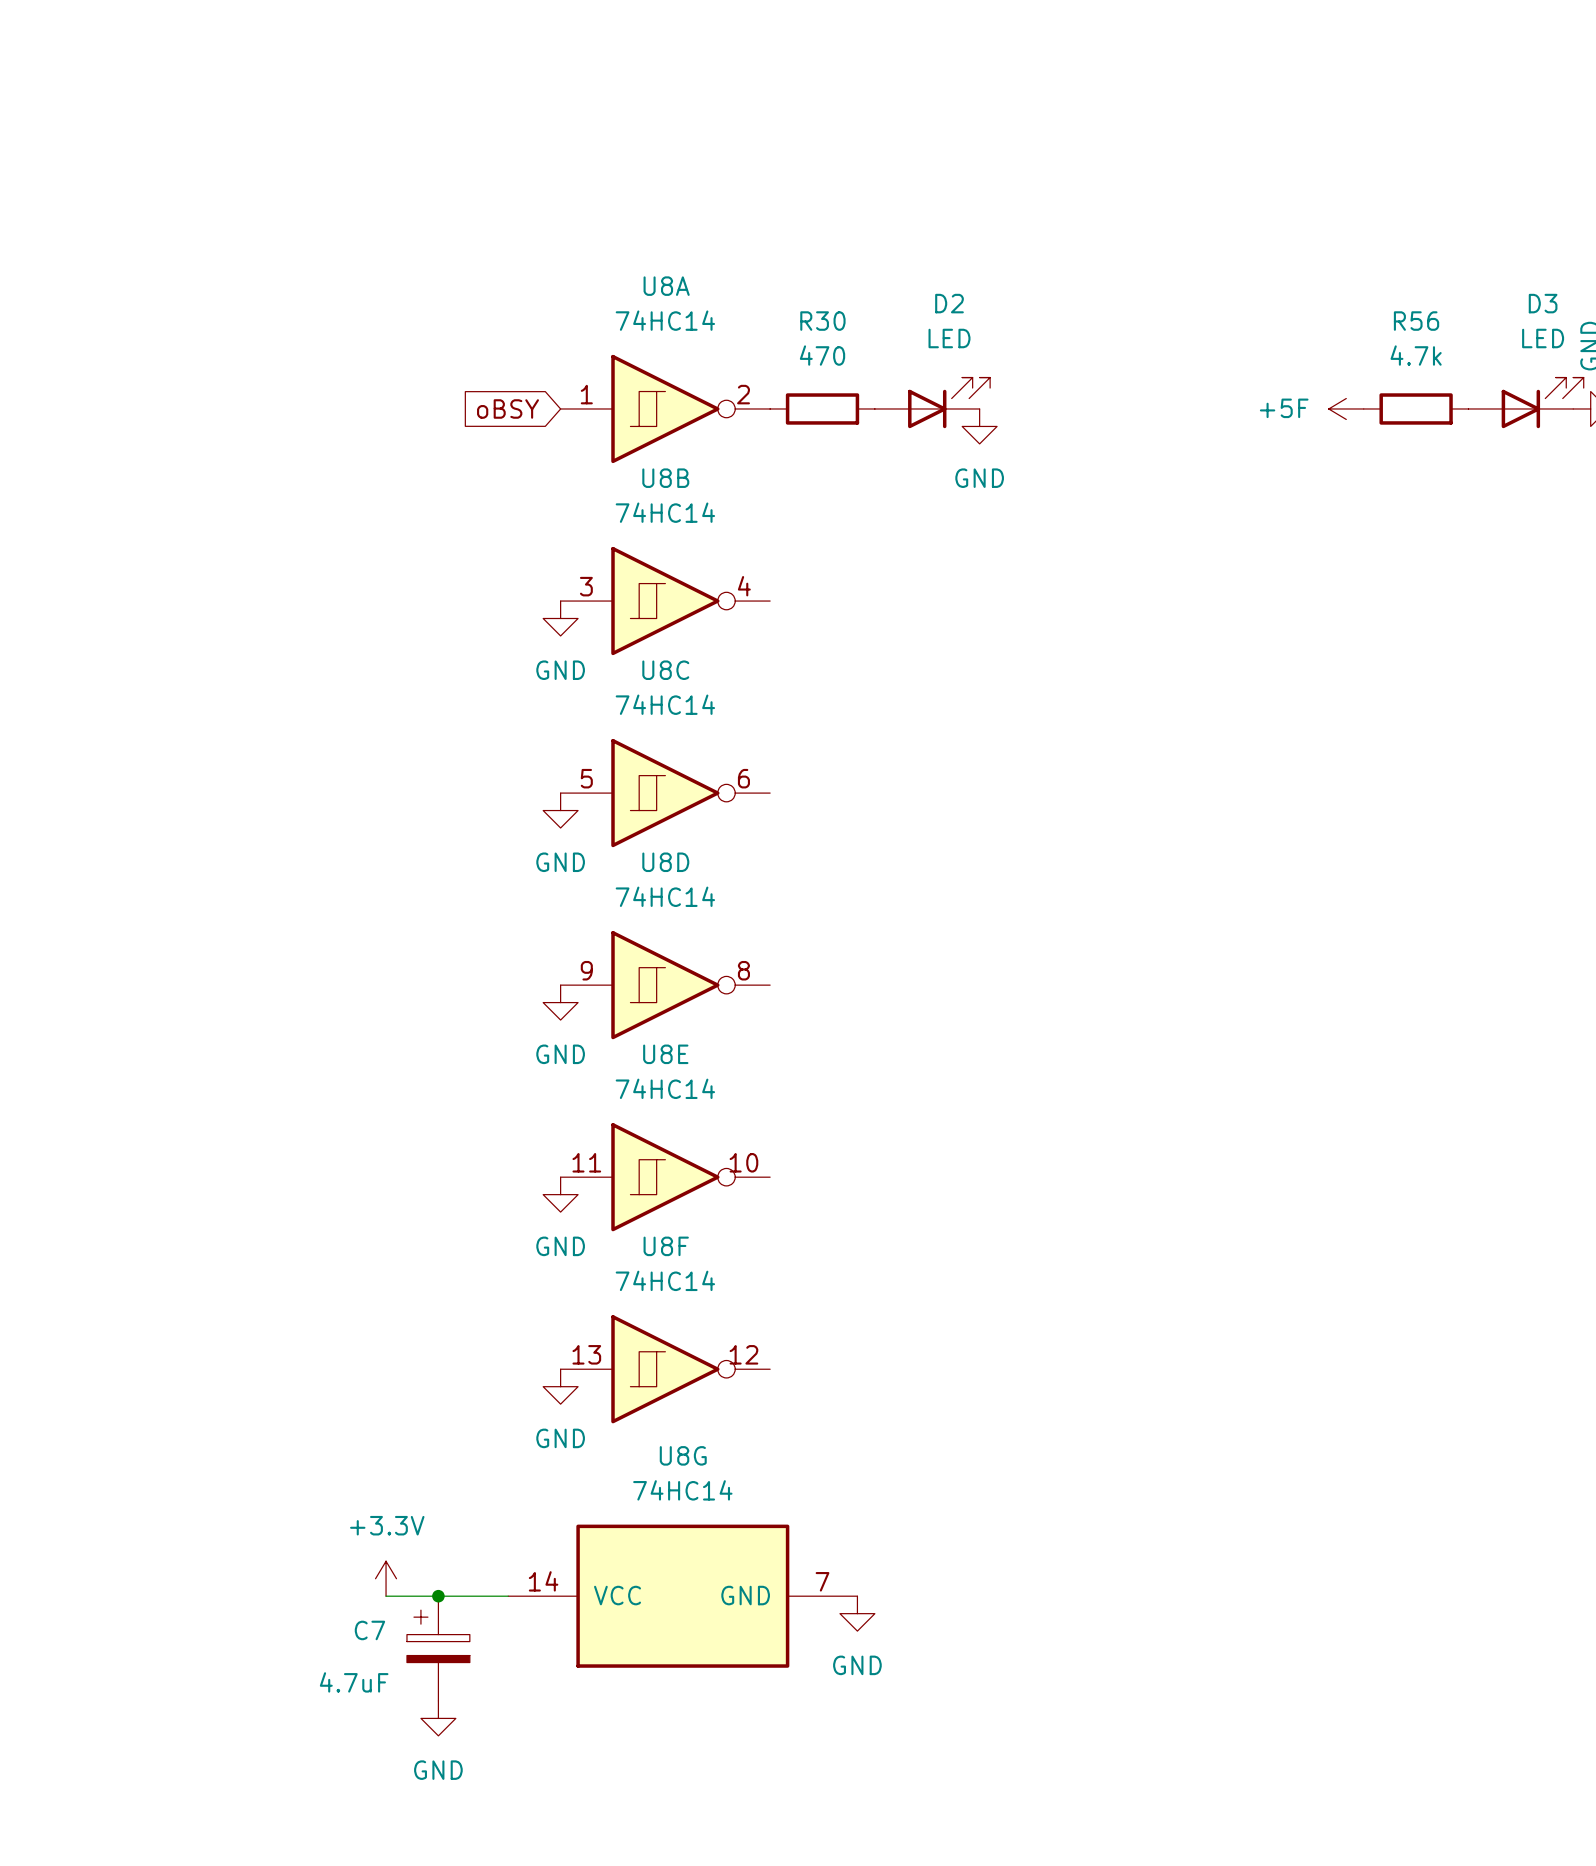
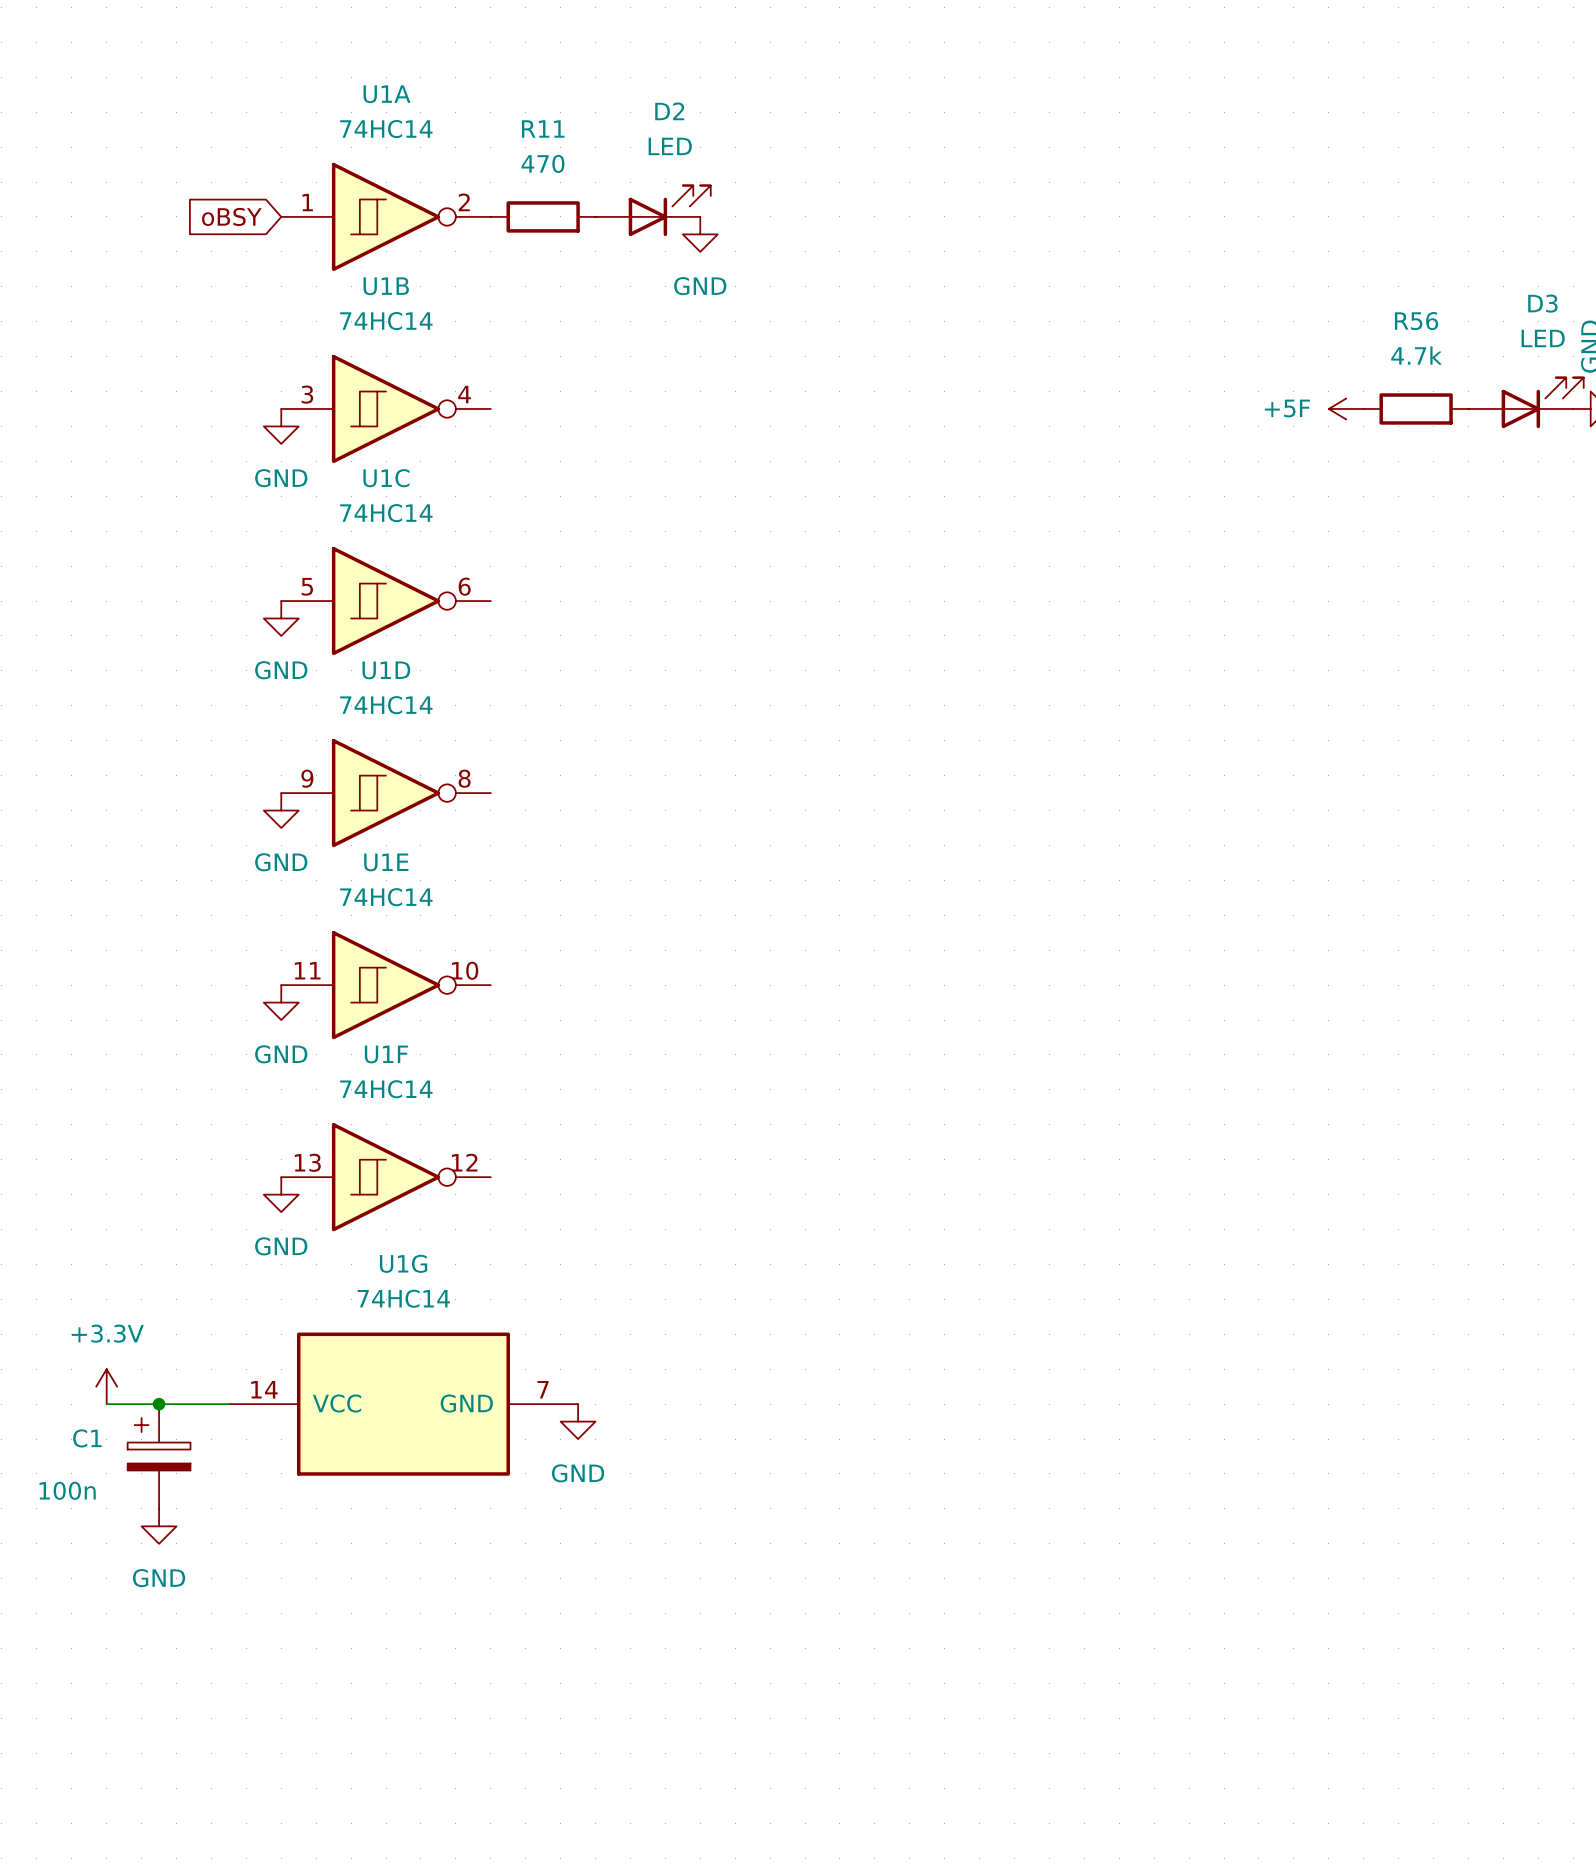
U1A: none -> 74HC14 (386, 216)
R11: none -> 470 (543, 216)
power symbol: none -> GND (700, 234)
D2 position: (932, 402) -> (653, 210)
U1B: none -> 74HC14 (386, 408)
global label position: oBSY (508, 408) -> oBSY (231, 216)
U8A: 74HC14 (665, 408) -> none
R30: 470 (822, 408) -> none
power symbol: none -> GND (281, 426)
power symbol: GND (979, 426) -> none
U1C: none -> 74HC14 (386, 601)
U8B: 74HC14 (665, 601) -> none
power symbol: none -> GND (281, 618)
power symbol: GND (560, 618) -> none
U1D: none -> 74HC14 (386, 793)
U8C: 74HC14 (665, 793) -> none
power symbol: none -> GND (281, 810)
power symbol: GND (560, 810) -> none
U1E: none -> 74HC14 (386, 985)
U8D: 74HC14 (665, 985) -> none
power symbol: none -> GND (281, 1002)
power symbol: GND (560, 1002) -> none
U1F: none -> 74HC14 (386, 1177)
U8E: 74HC14 (665, 1177) -> none
power symbol: none -> GND (281, 1194)
power symbol: GND (560, 1194) -> none
U8F: 74HC14 (665, 1369) -> none
power symbol position: GND (560, 1386) -> GND (578, 1421)
junction: none -> (159, 1404)
U1G: none -> 74HC14 (403, 1404)
C1: none -> 100n (159, 1456)
power symbol: none -> GND (159, 1526)
power symbol position: +3.3V (386, 1578) -> +3.3V (106, 1386)
wire: (386, 1596) (508, 1596) -> (106, 1404) (228, 1404)
junction: (438, 1596) -> none
U8G: 74HC14 (682, 1596) -> none
power symbol: GND (857, 1613) -> none
C7: 4.7uF (438, 1648) -> none
power symbol: GND (438, 1718) -> none

